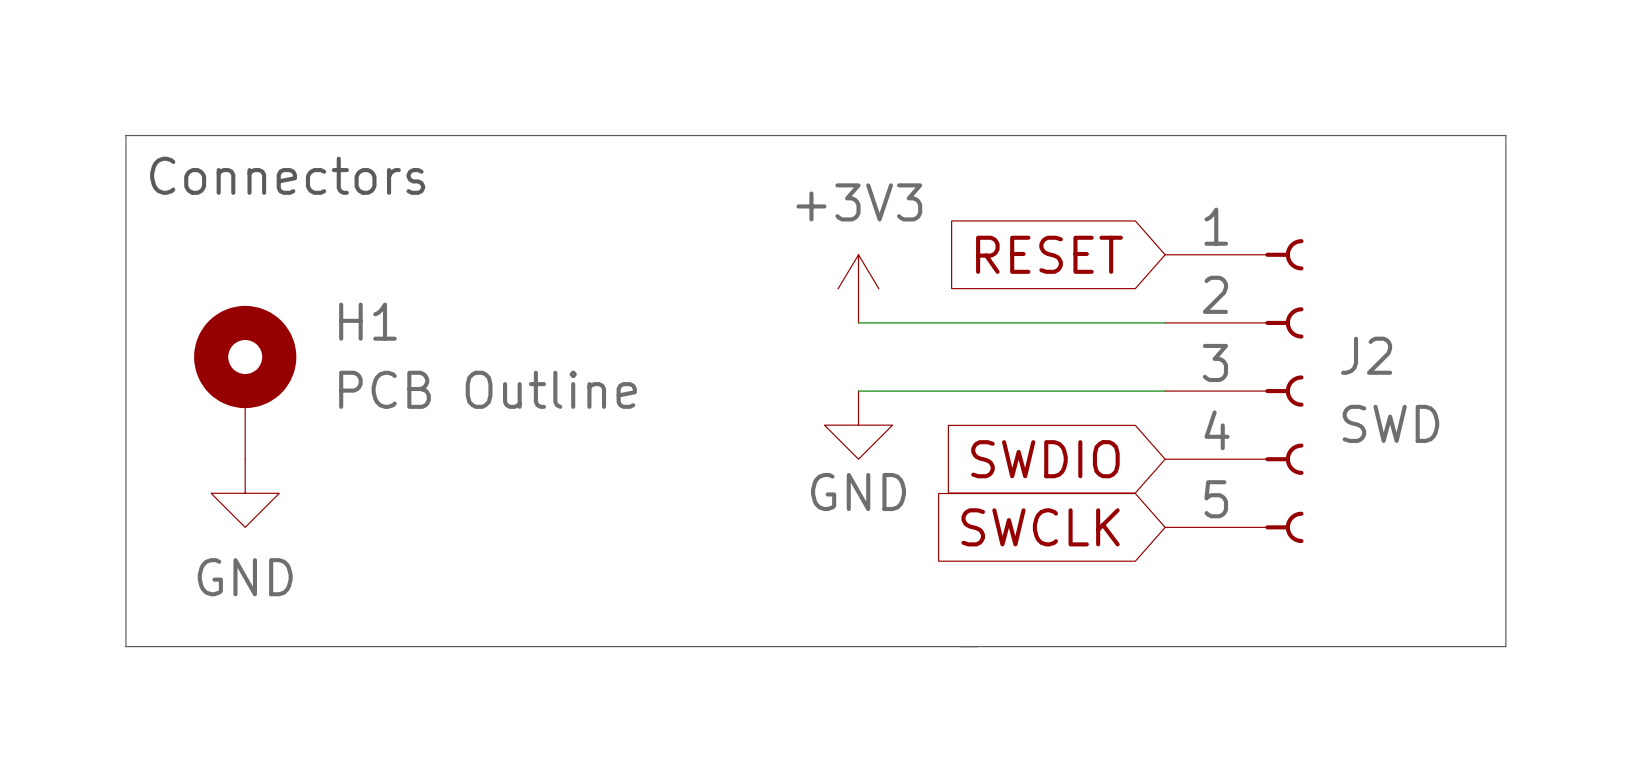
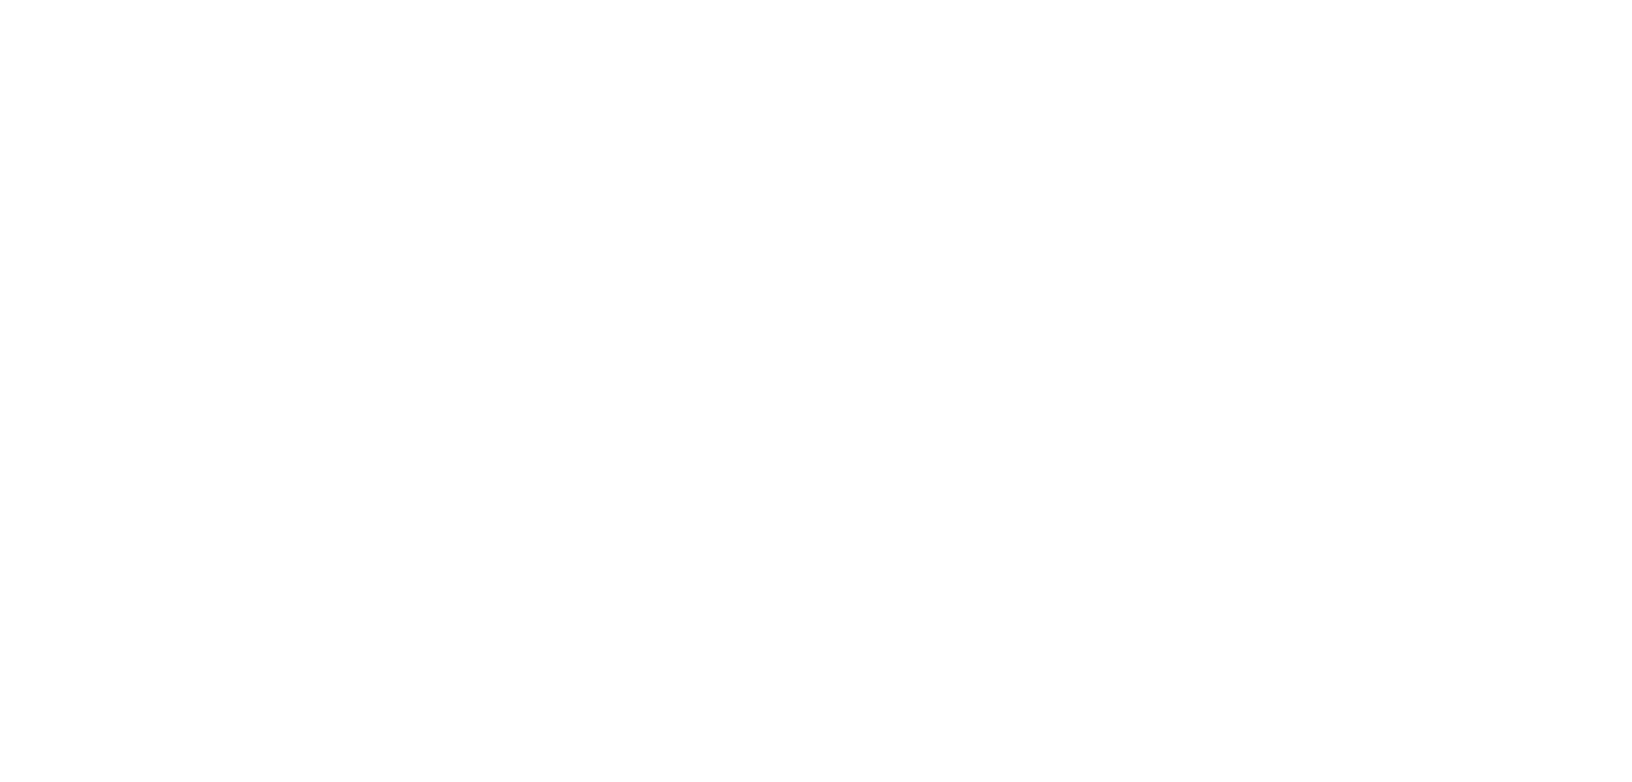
line: (125, 135) (125, 646) (1505, 646) (1505, 135) (125, 135) -> none
text: Connectors (287, 175) -> none
global label: RESET (1049, 254) -> none
power symbol: +3V3 (858, 288) -> none
wire: (858, 322) (1165, 322) -> none
H1: PCB Outline (245, 382) -> none
wire: (858, 391) (1165, 391) -> none
J2: SWD (1234, 391) -> none
power symbol: GND (858, 425) -> none
global label: SWDIO (1045, 459) -> none
power symbol: GND (245, 493) -> none
global label: SWCLK (1040, 527) -> none

